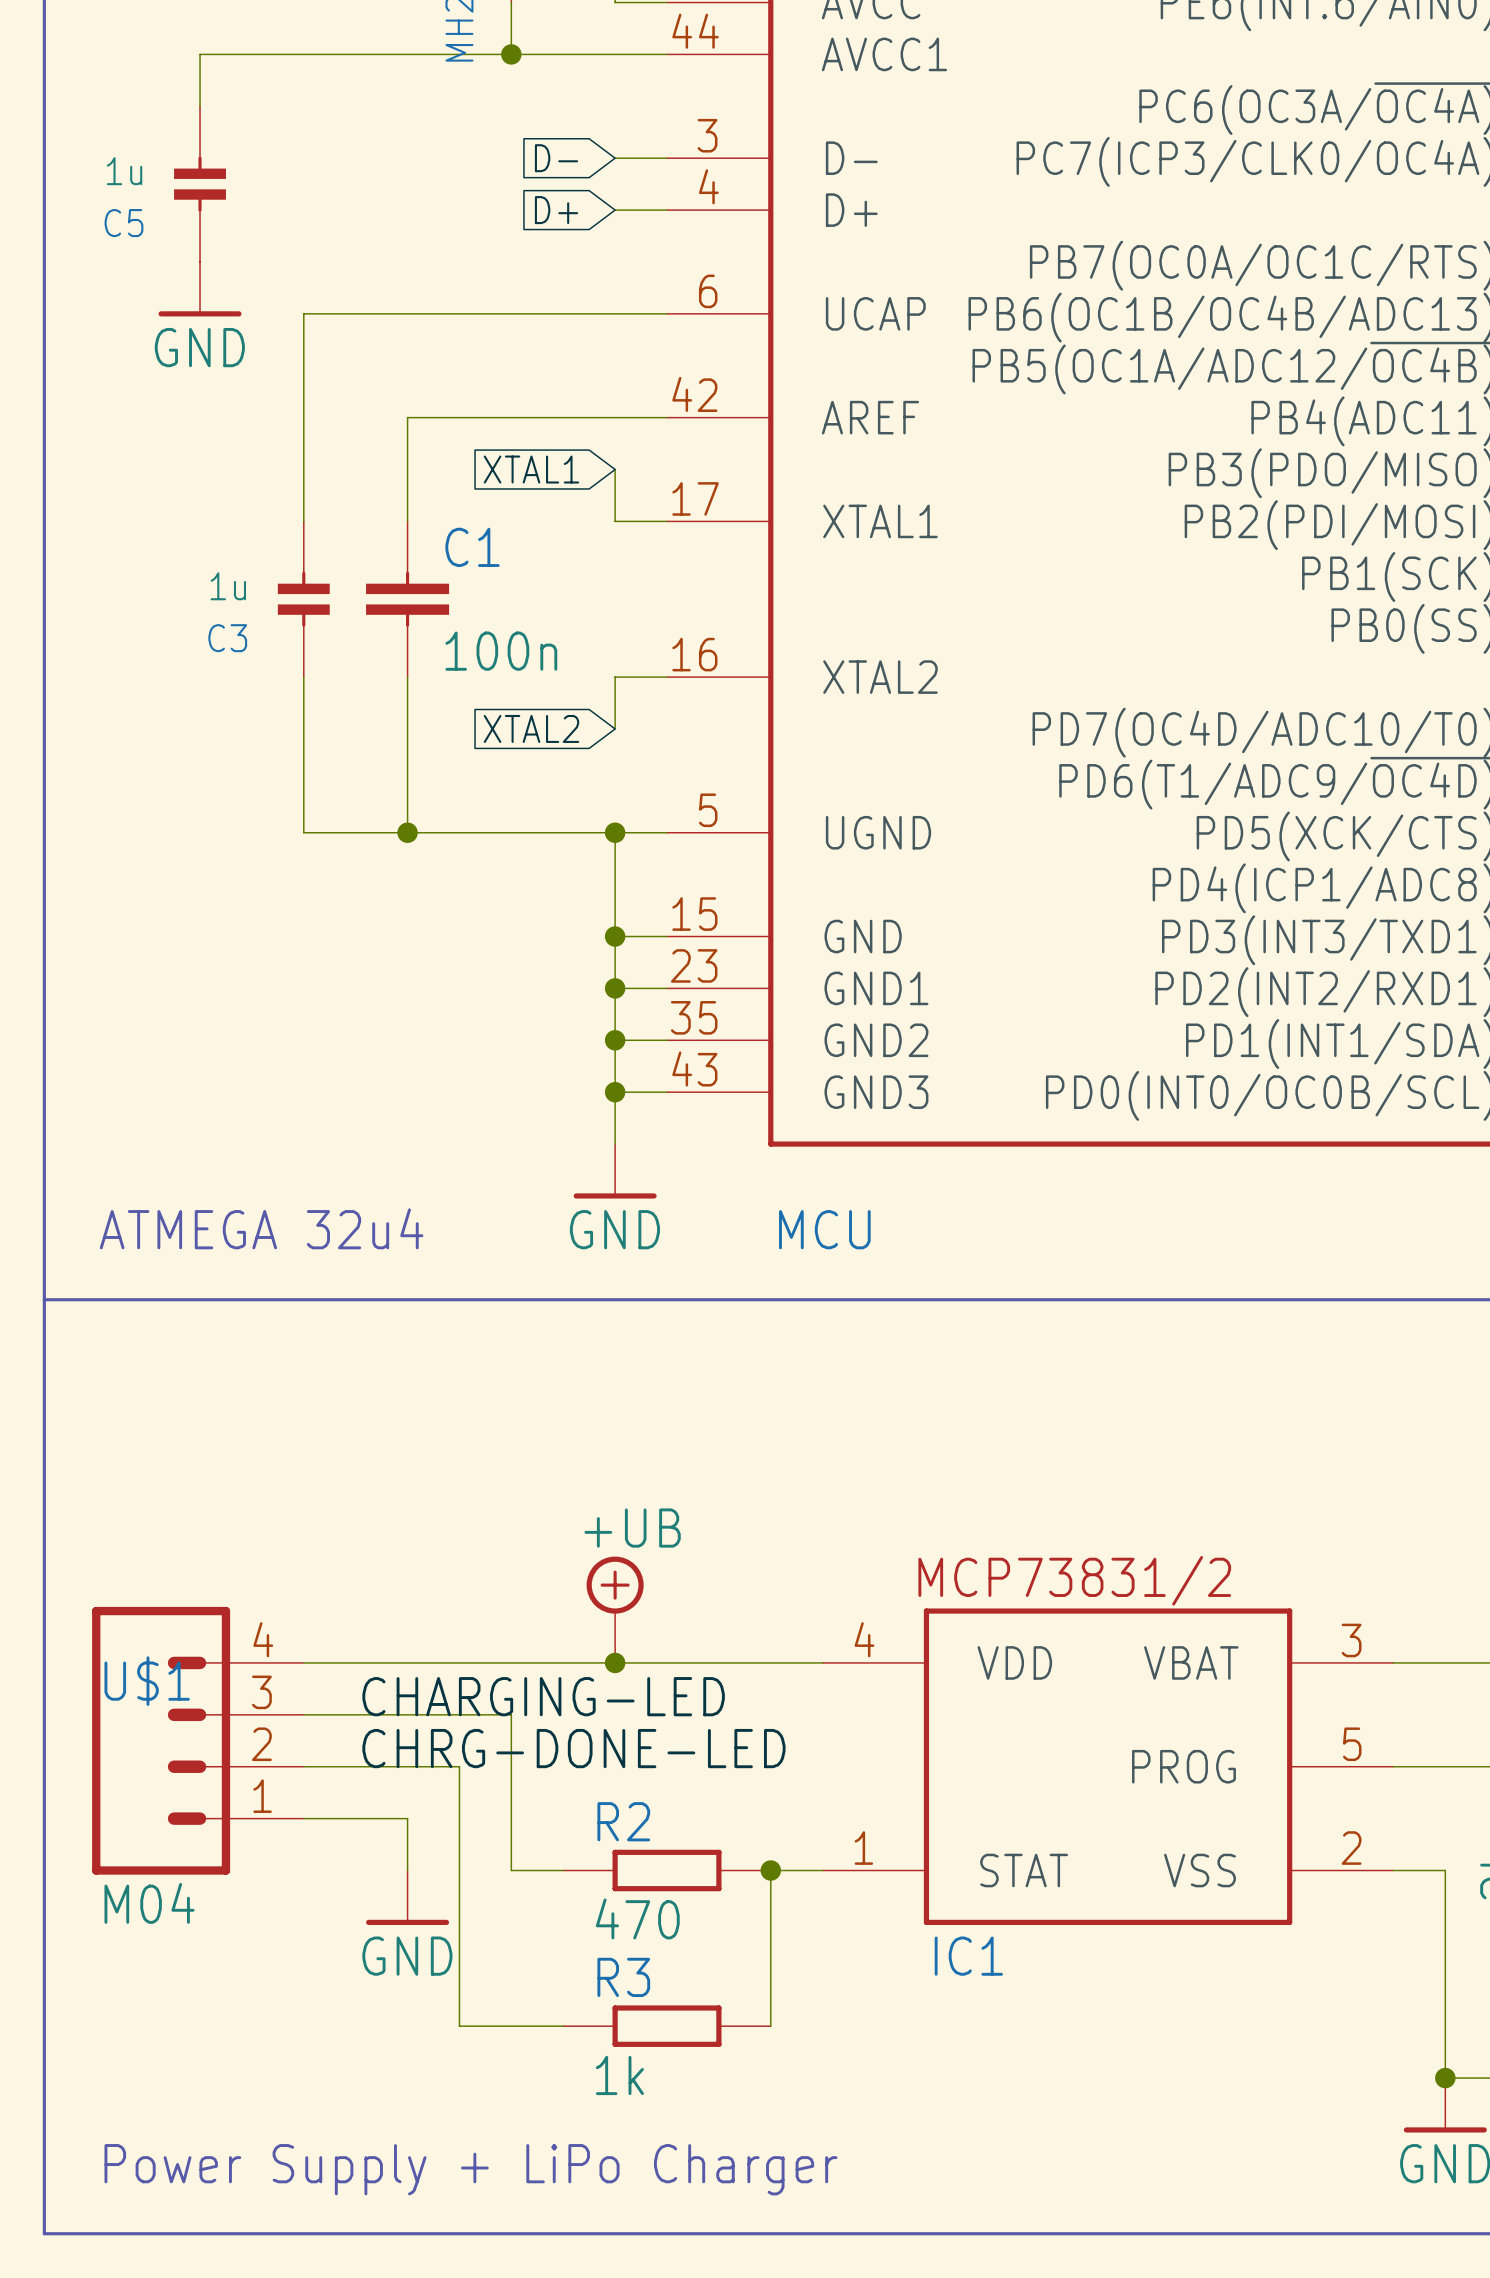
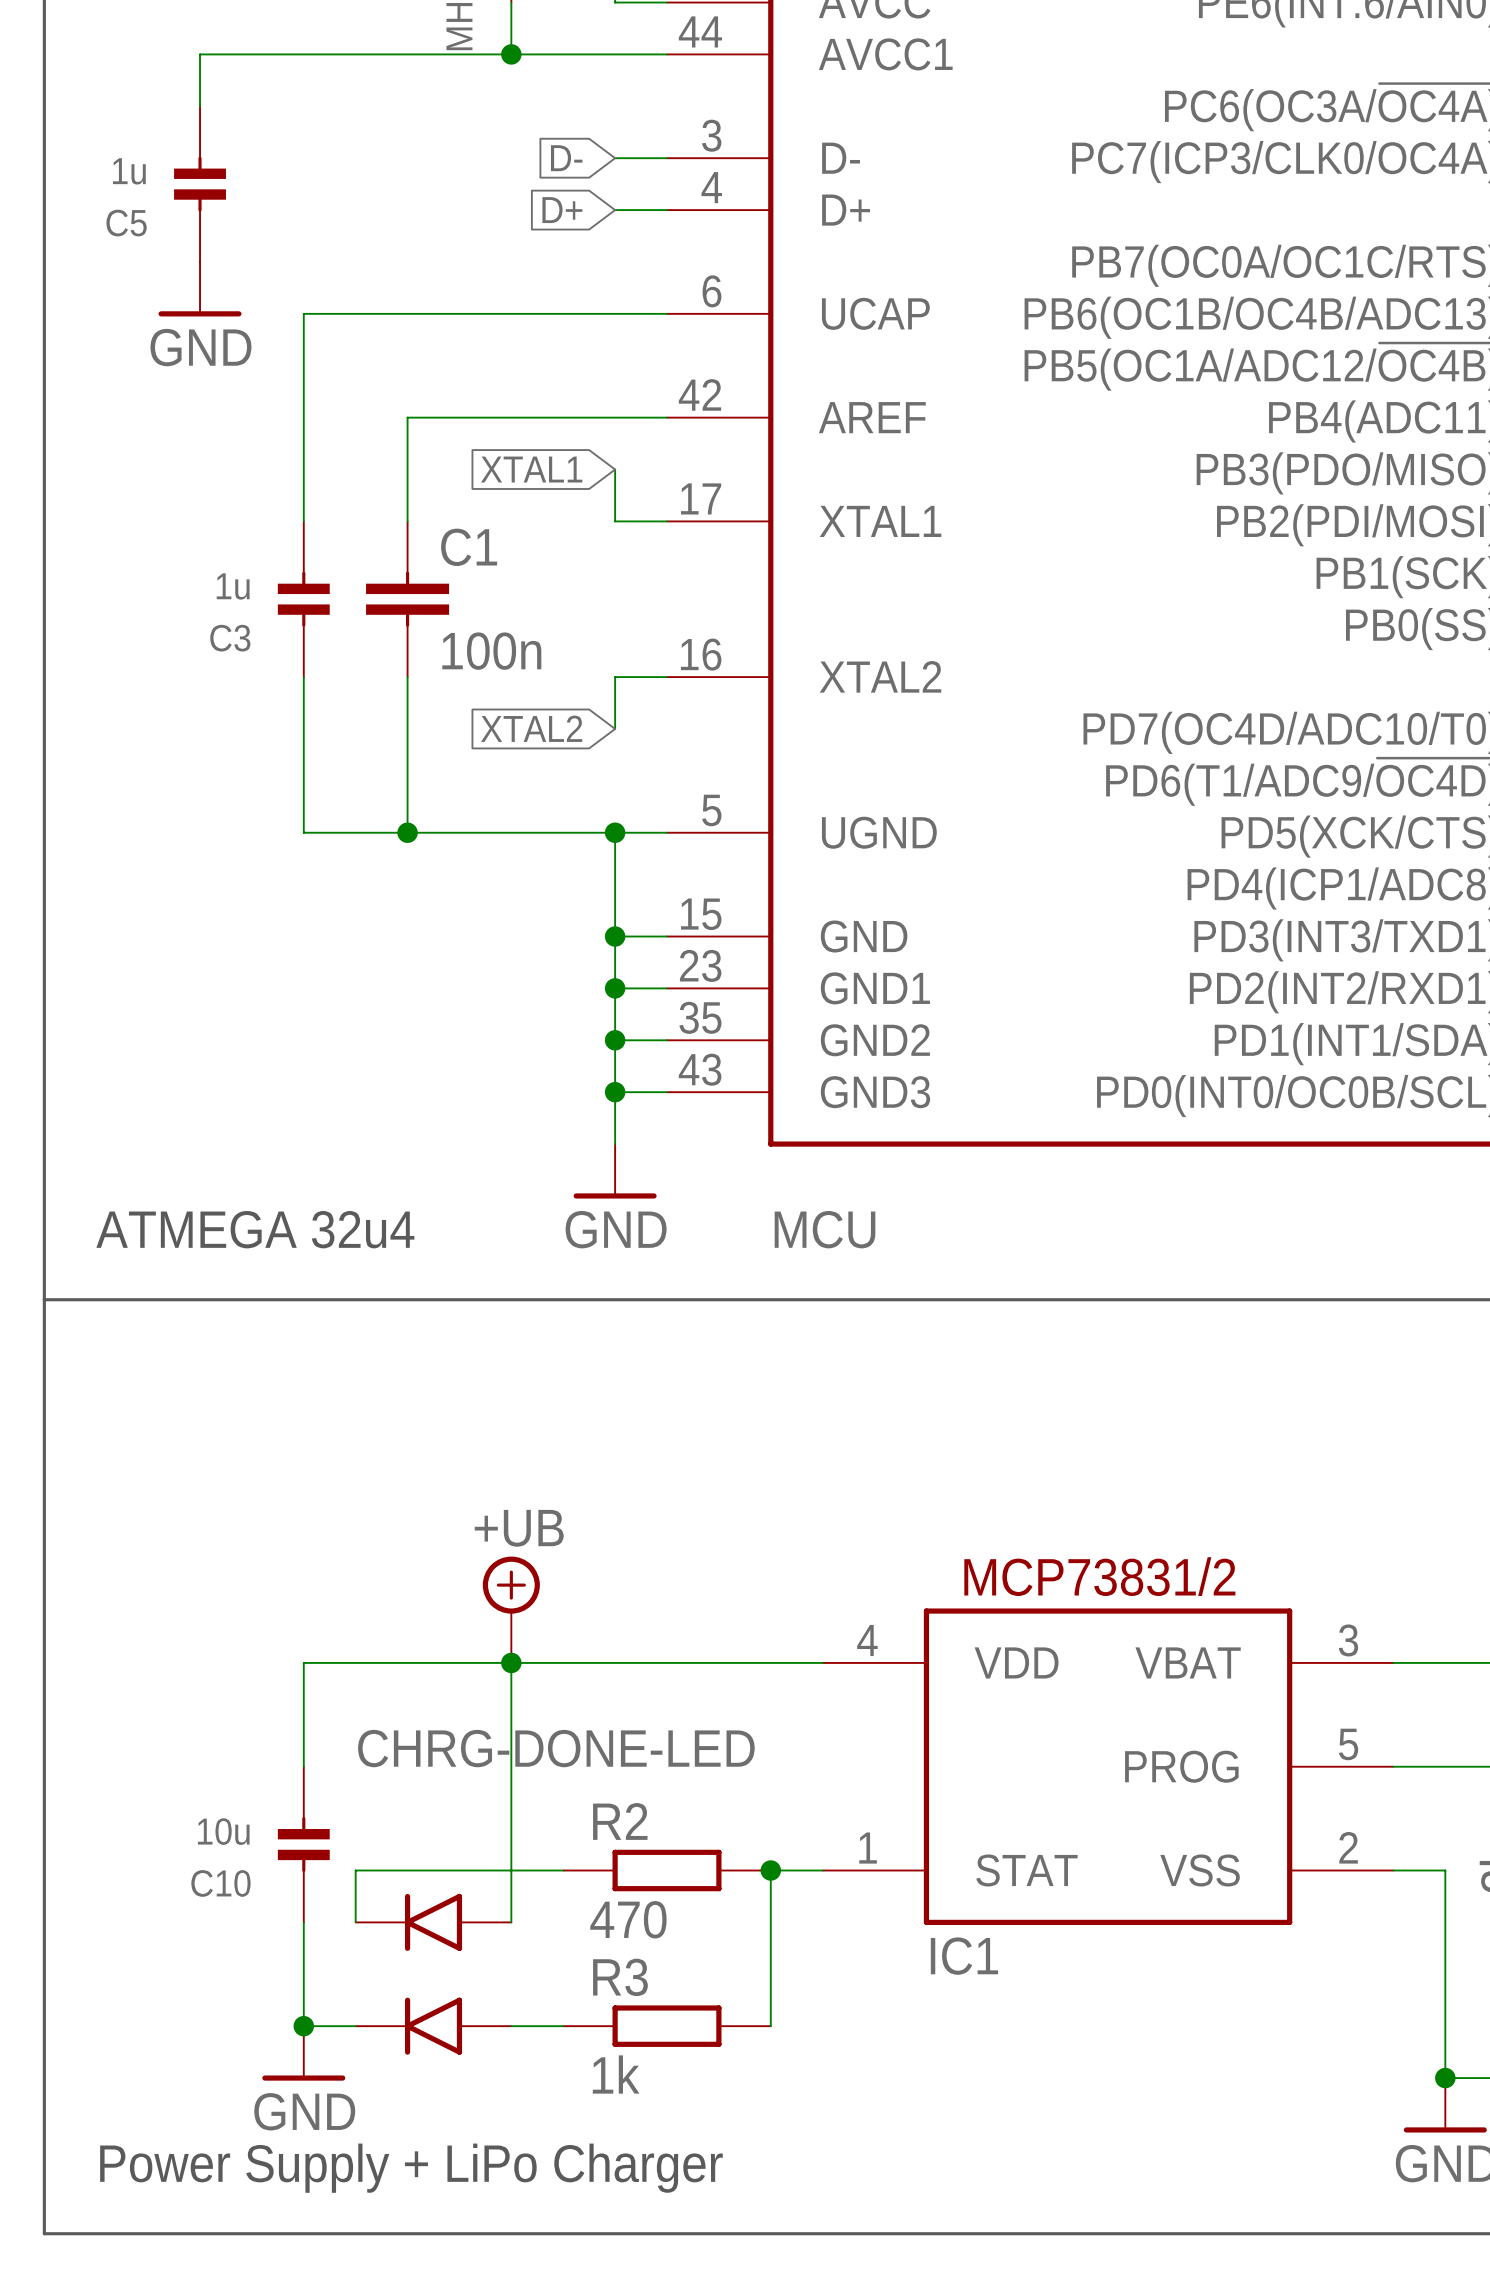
power symbol position: +UB (615, 1609) -> +UB (511, 1609)
junction position: (615, 1662) -> (511, 1662)
label: CHARGING-LED (543, 1696) -> none
wire: (303, 1714) (511, 1714) -> (511, 1662) (511, 1714)
U$1: M04 (197, 1740) -> none
wire: (303, 1766) (459, 1766) (459, 2026) (511, 2026) -> (303, 1766) (303, 1662)
wire: (303, 1818) (407, 1818) (407, 1870) -> none
C10: none -> 10u (303, 1844)
power symbol position: GND (407, 1897) -> GND (303, 2053)
wire: none -> (303, 1922) (303, 2026) (355, 2026)
wire: none -> (355, 1922) (355, 1870) (511, 1870) (511, 1922)
part: none -> (433, 1974)
junction: none -> (303, 2026)

